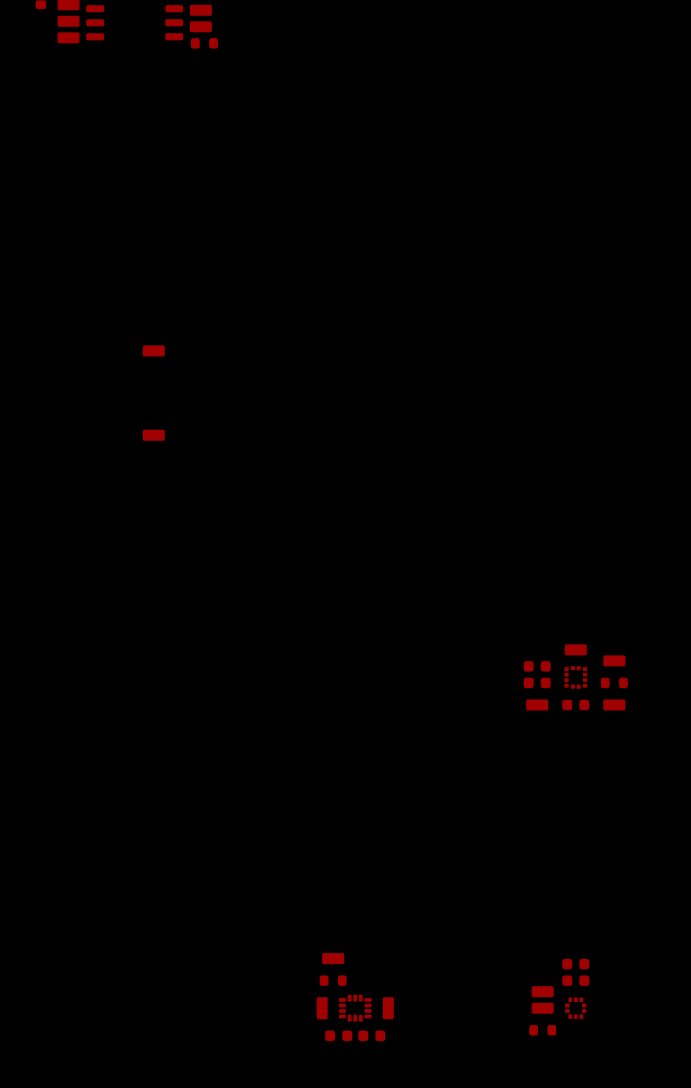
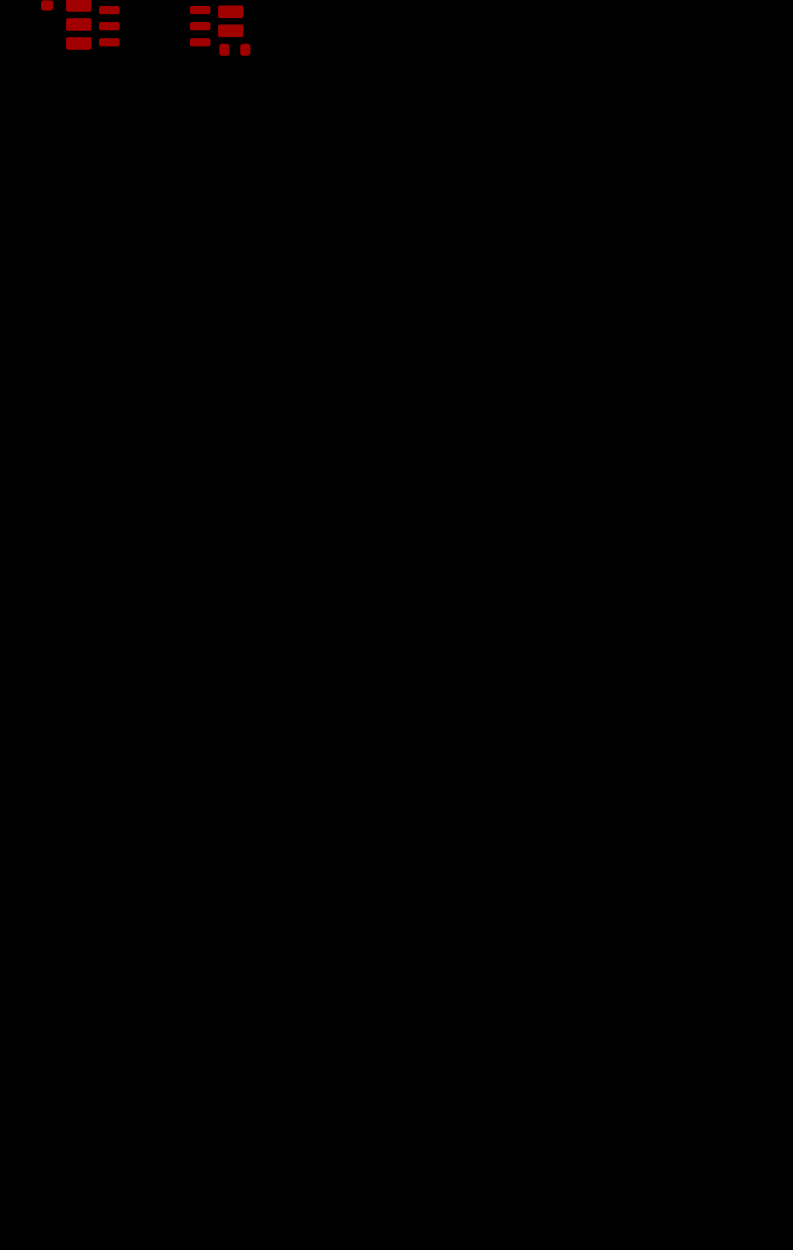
part: (153, 350) -> none
part: (153, 435) -> none
part: (575, 649) -> none
part: (614, 660) -> none
part: (537, 666) -> none
part: (575, 677) -> none
part: (537, 682) -> none
part: (614, 682) -> none
part: (537, 704) -> none
part: (575, 704) -> none
part: (614, 704) -> none
part: (333, 958) -> none
part: (575, 964) -> none
part: (333, 980) -> none
part: (575, 980) -> none
part: (542, 991) -> none
part: (322, 1008) -> none
part: (355, 1008) -> none
part: (388, 1008) -> none
part: (542, 1008) -> none
part: (575, 1008) -> none
part: (542, 1030) -> none
part: (338, 1035) -> none
part: (371, 1035) -> none

